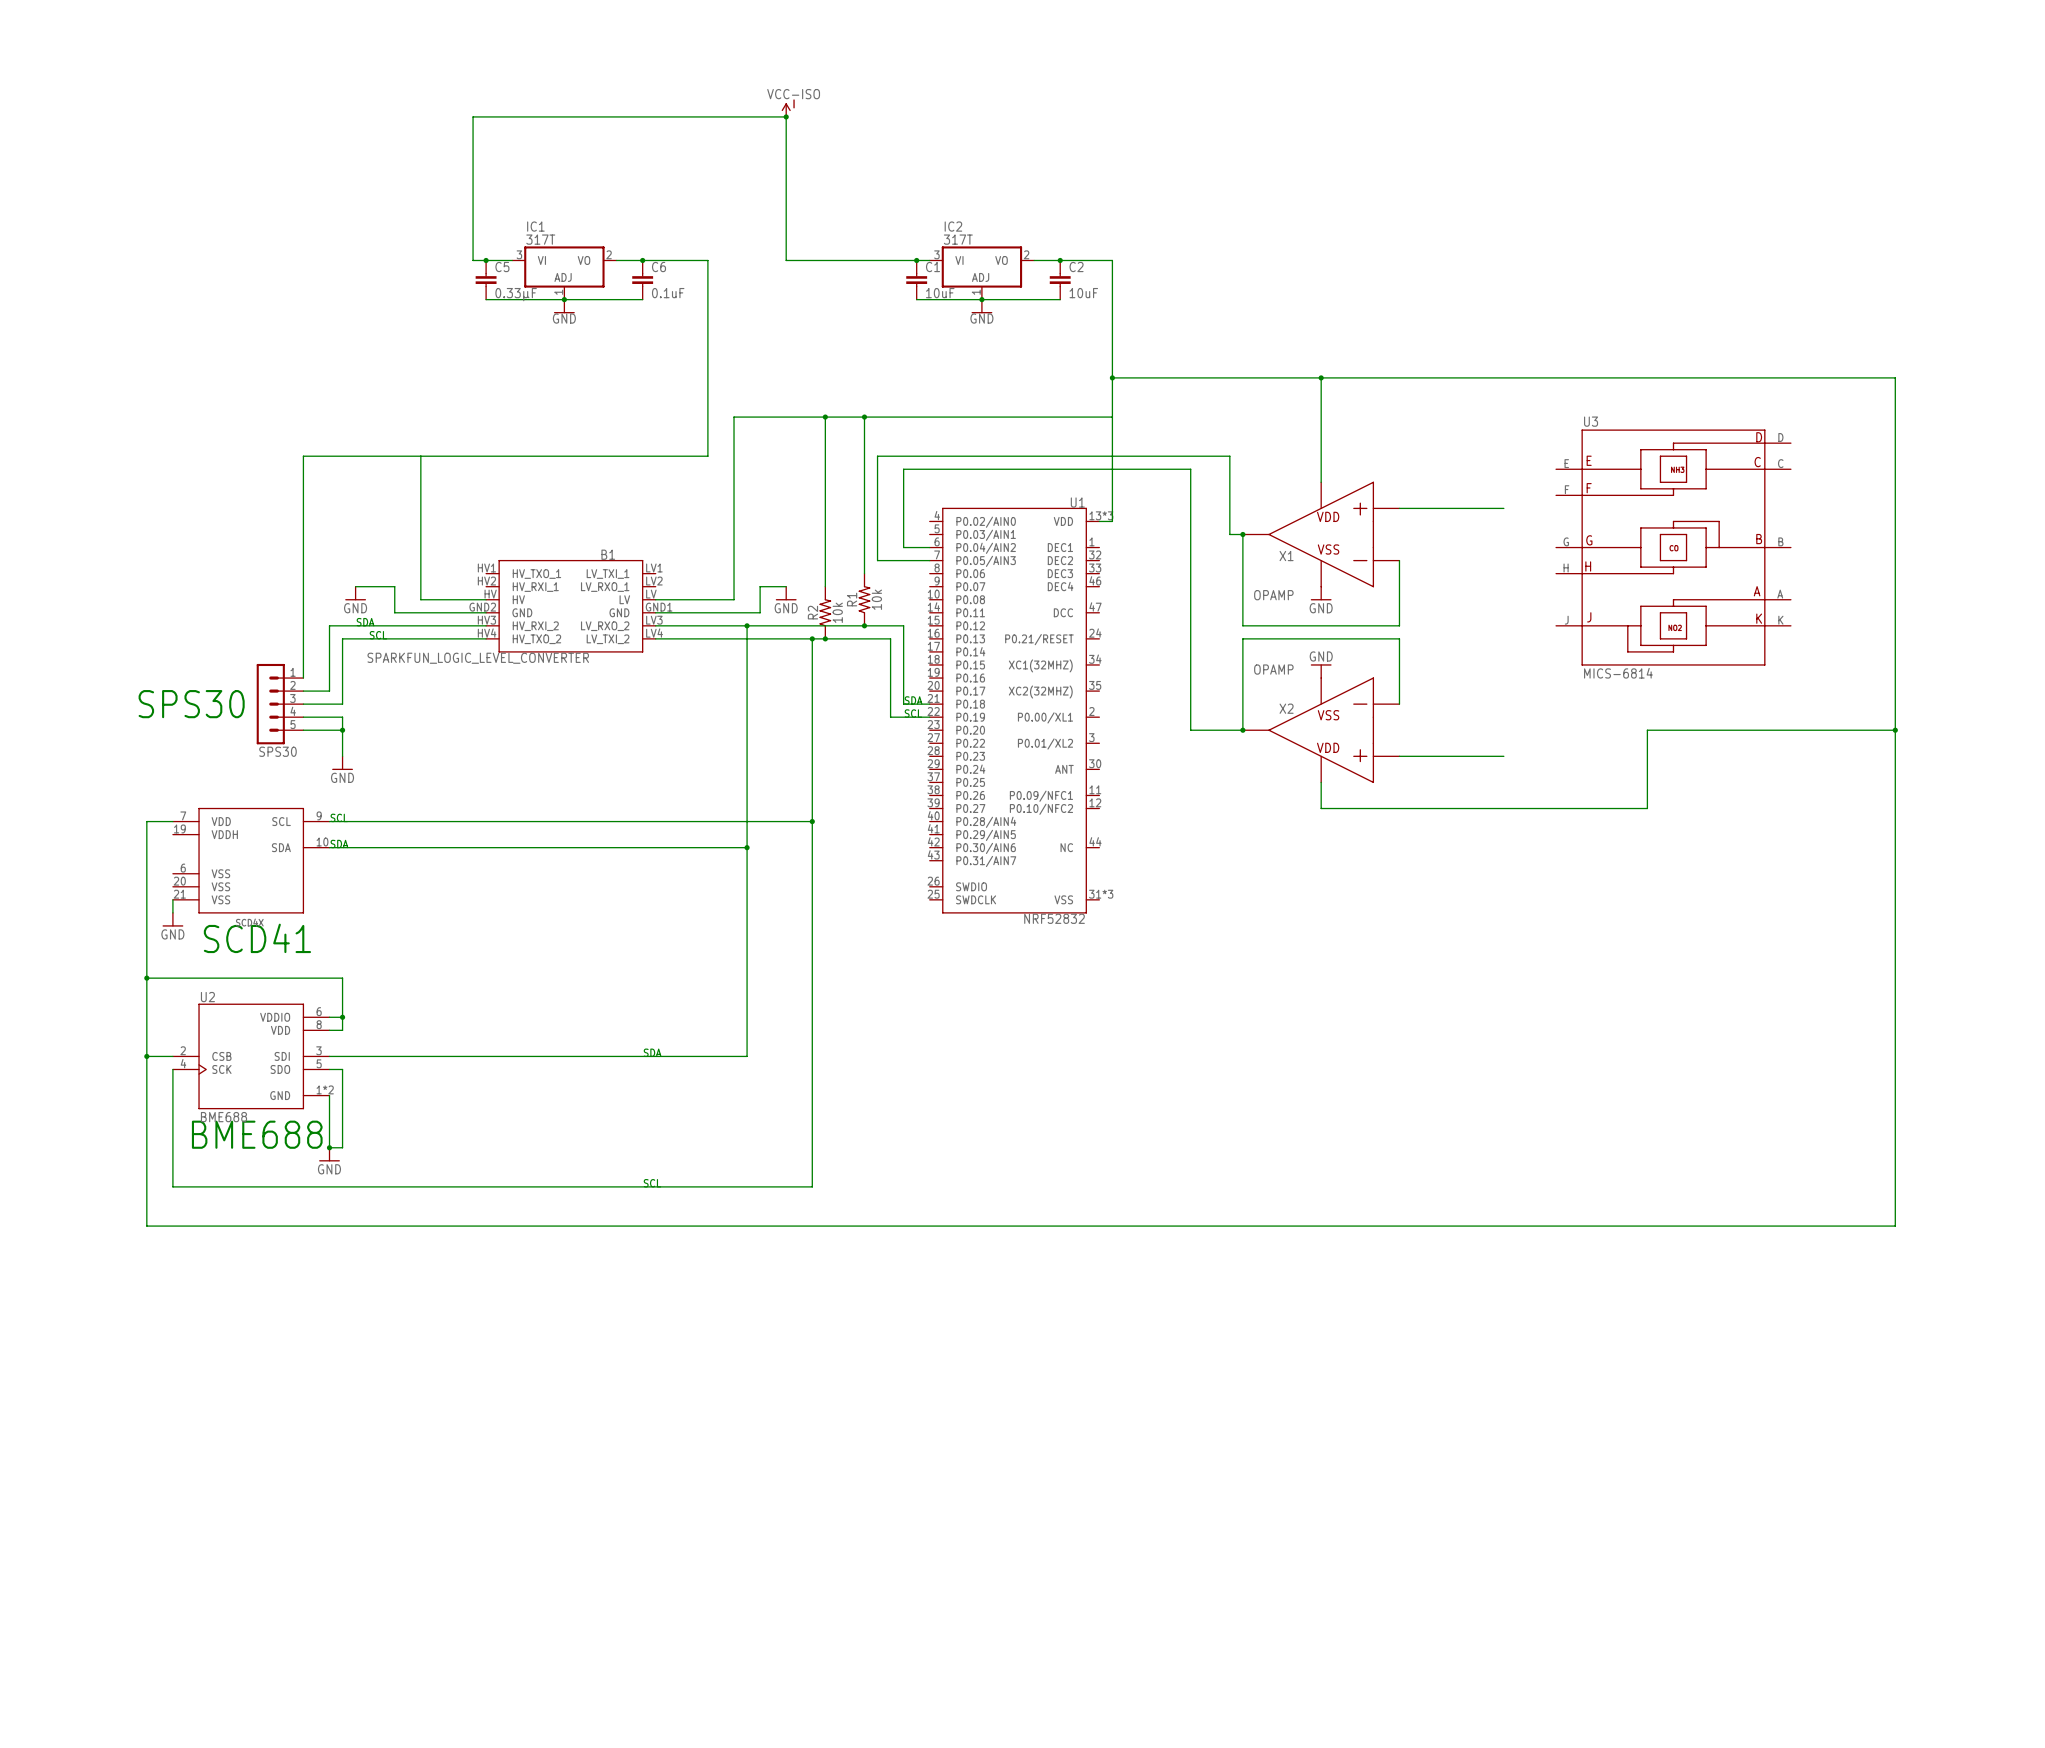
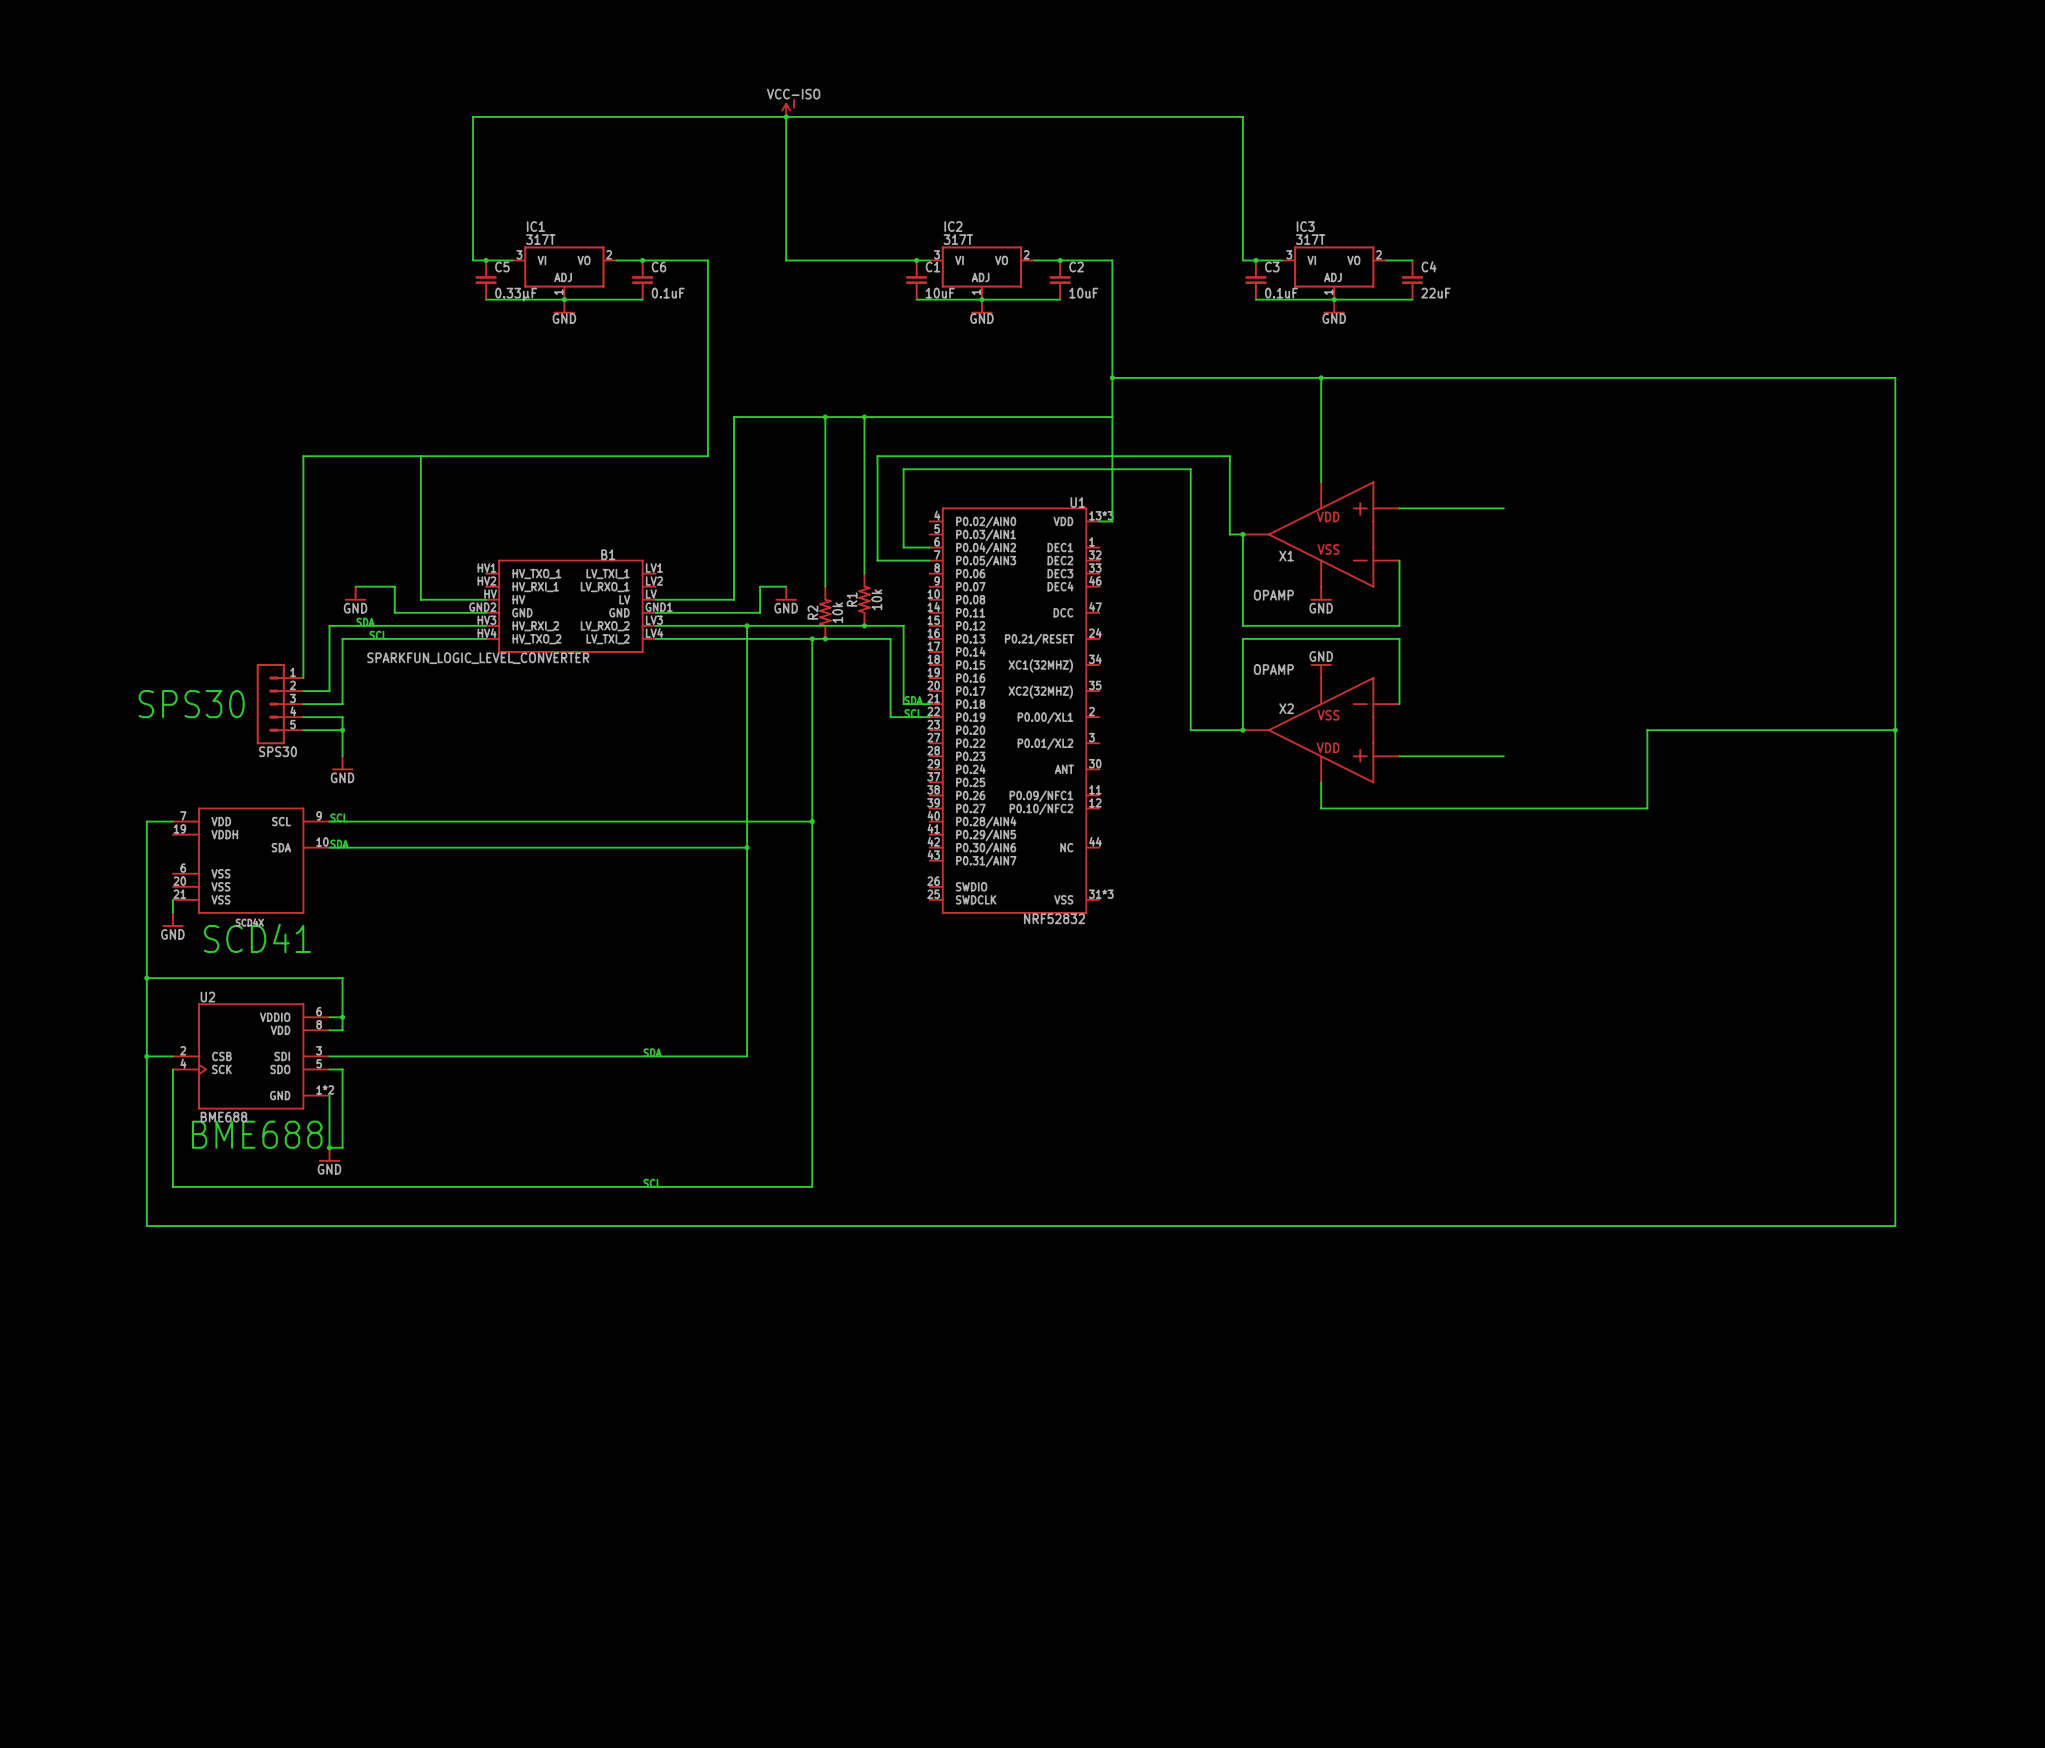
wire: none -> (786, 116) (1242, 116) (1242, 260) (1282, 260)
junction: none -> (1255, 260)
wire: none -> (1386, 260) (1412, 260)
IC3: none -> 317T (1334, 273)
C3: none -> 0.1uF (1255, 280)
C4: none -> 22uF (1412, 280)
wire: none -> (1255, 299) (1412, 299)
junction: none -> (1334, 299)
power symbol: none -> GND (1334, 306)
U3: MICS-6814 (1673, 547) -> none

